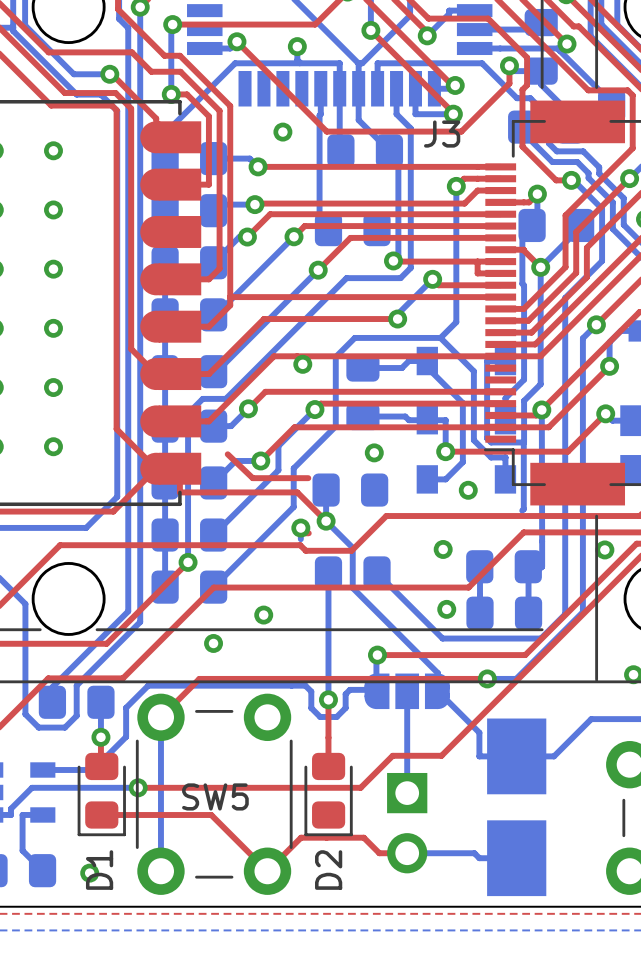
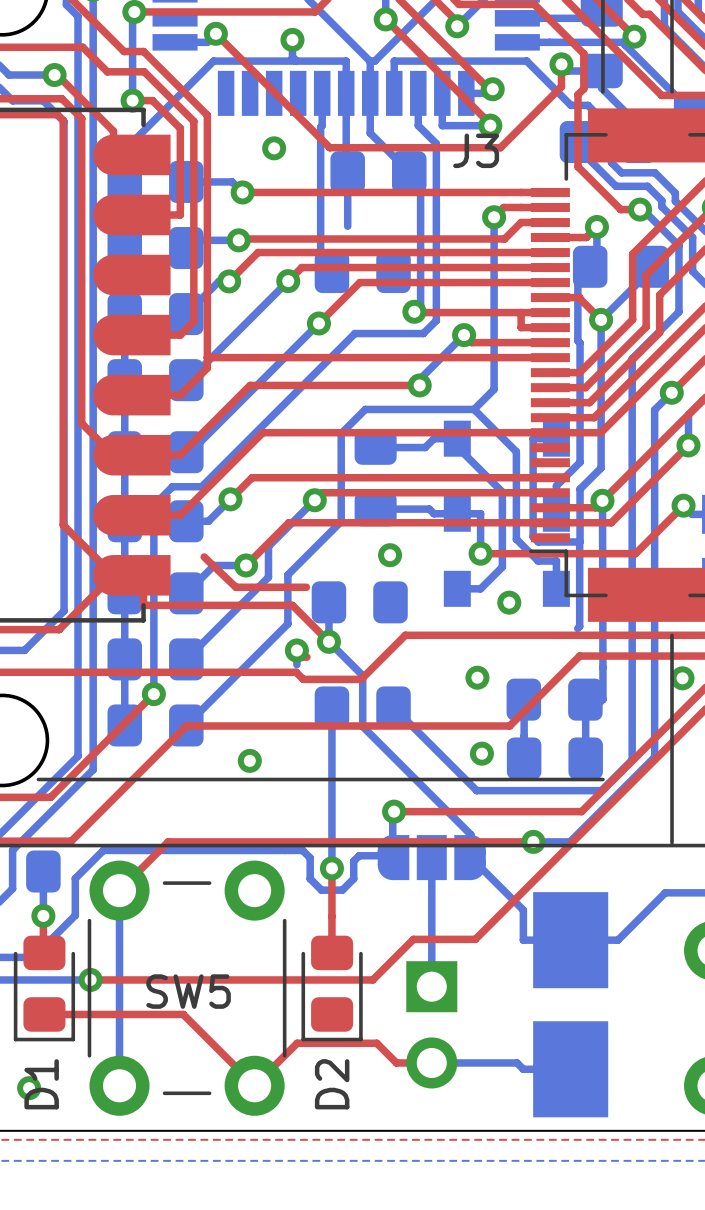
bottom track: none -> (347, 172) (347, 226)
via: (302, 364) -> none
via: (213, 643) -> none

